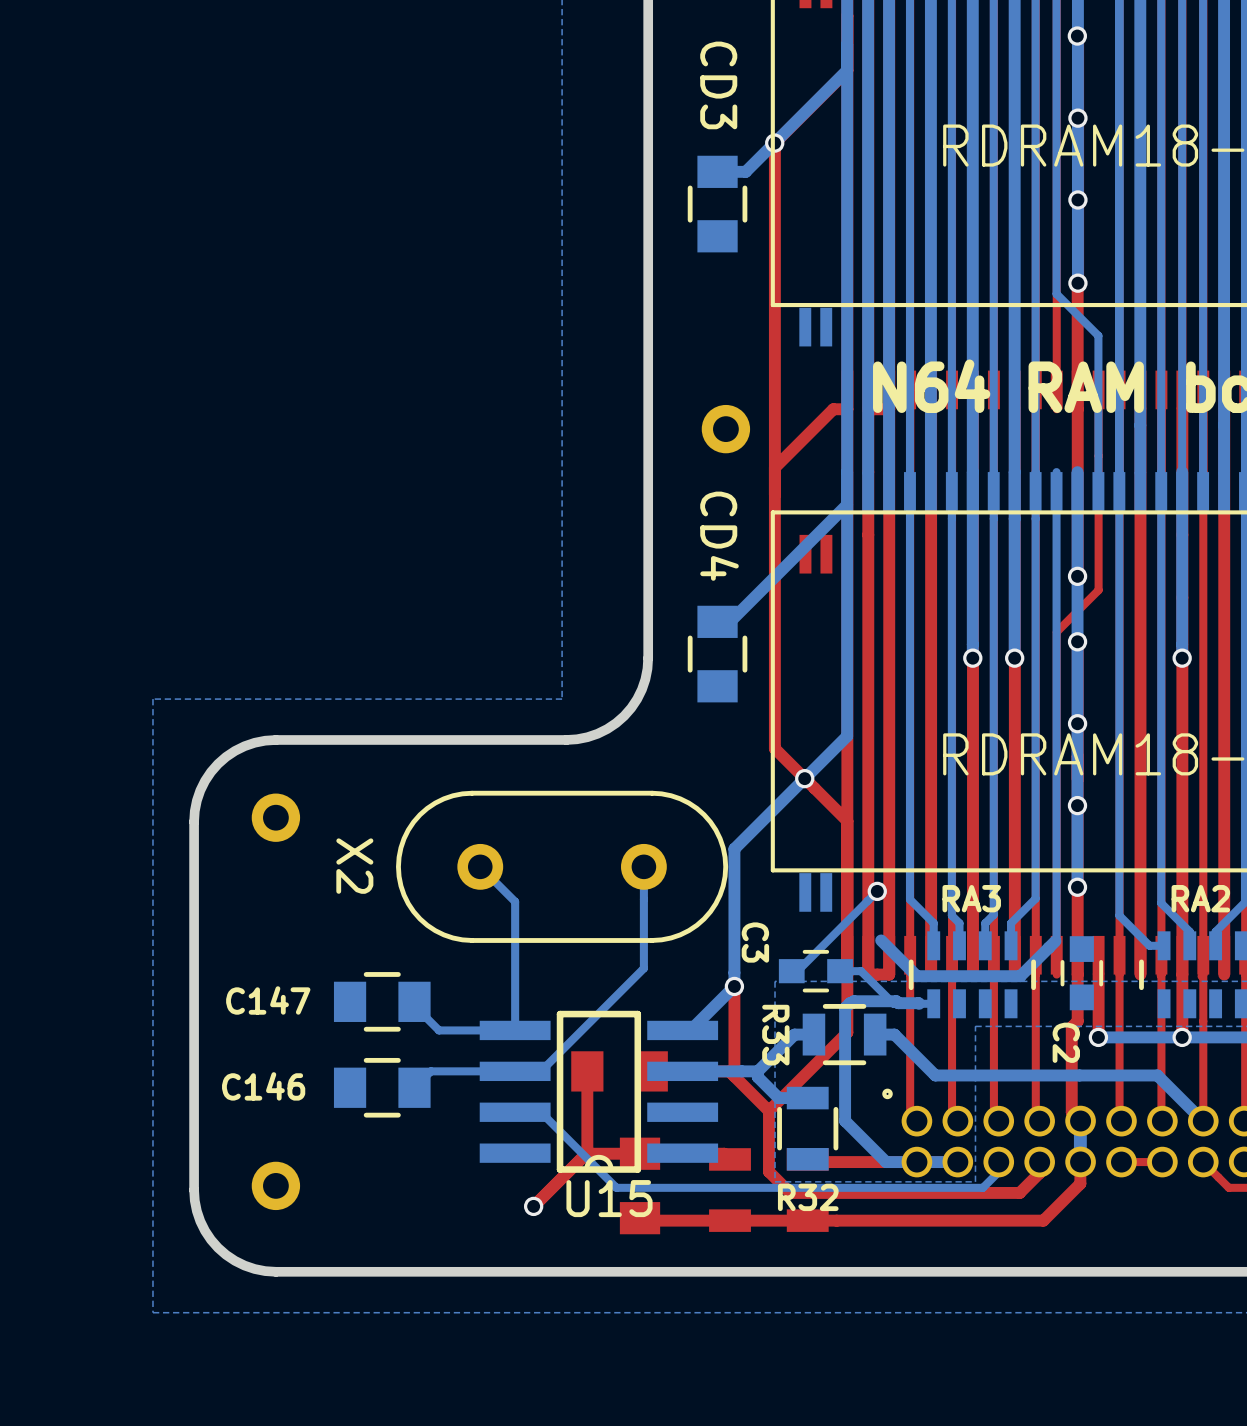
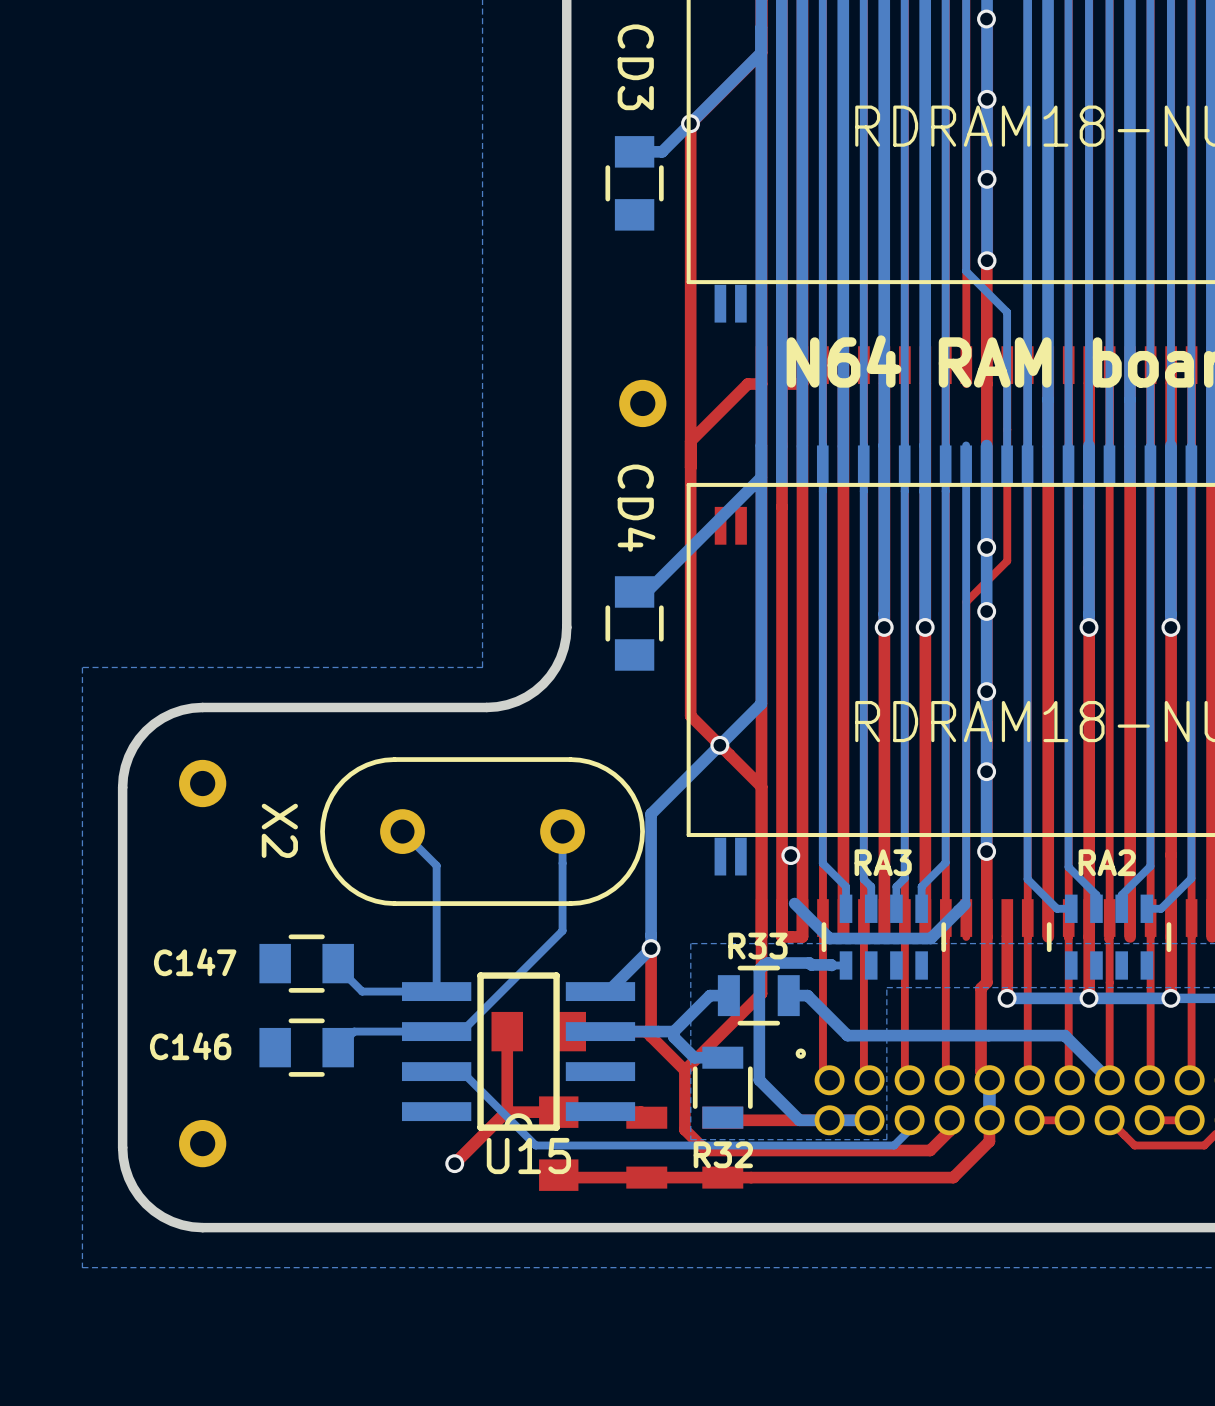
bottom track: (877, 891) (797, 971) (791, 971) -> none
C3: (815, 971) -> none
bottom track: (840, 971) (861, 971) (893, 1003) (919, 1003) -> none
C2: (1081, 973) -> none
R33 name rotation: 0° (775, 1035) -> 90° counterclockwise (757, 946)
R33 name position: R33 (775, 1035) -> R33 (757, 946)

